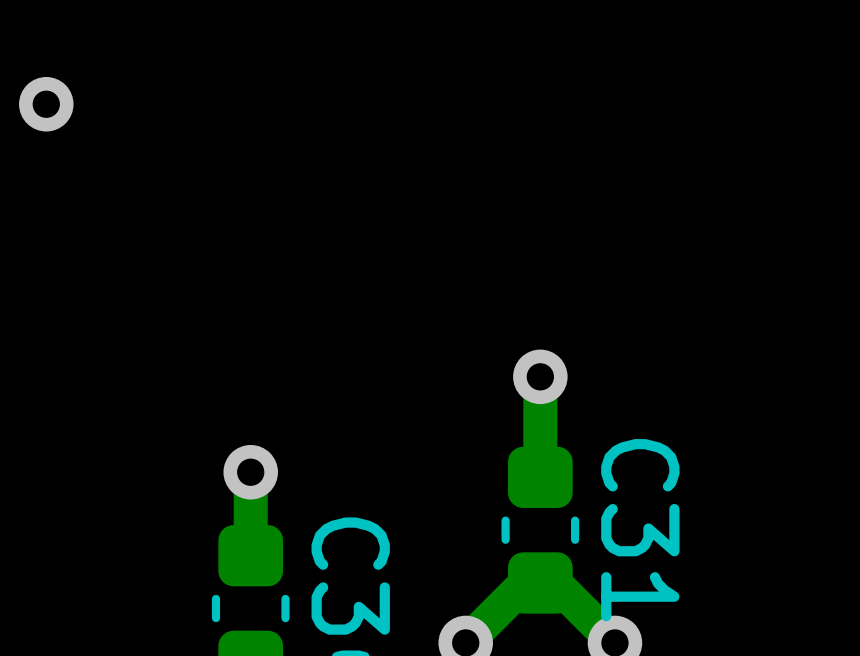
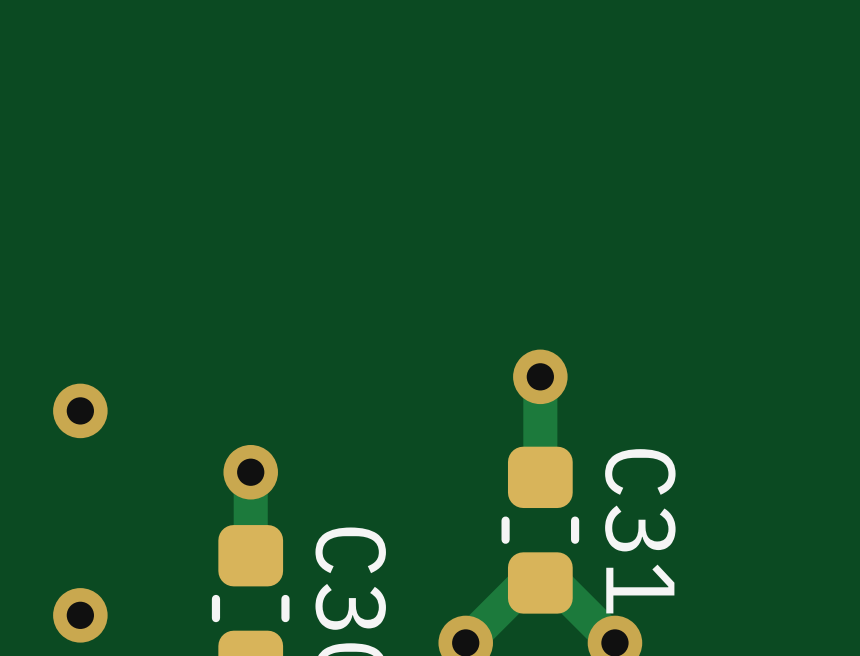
via: (46, 104) -> none
via: none -> (80, 410)
via: none -> (80, 615)

